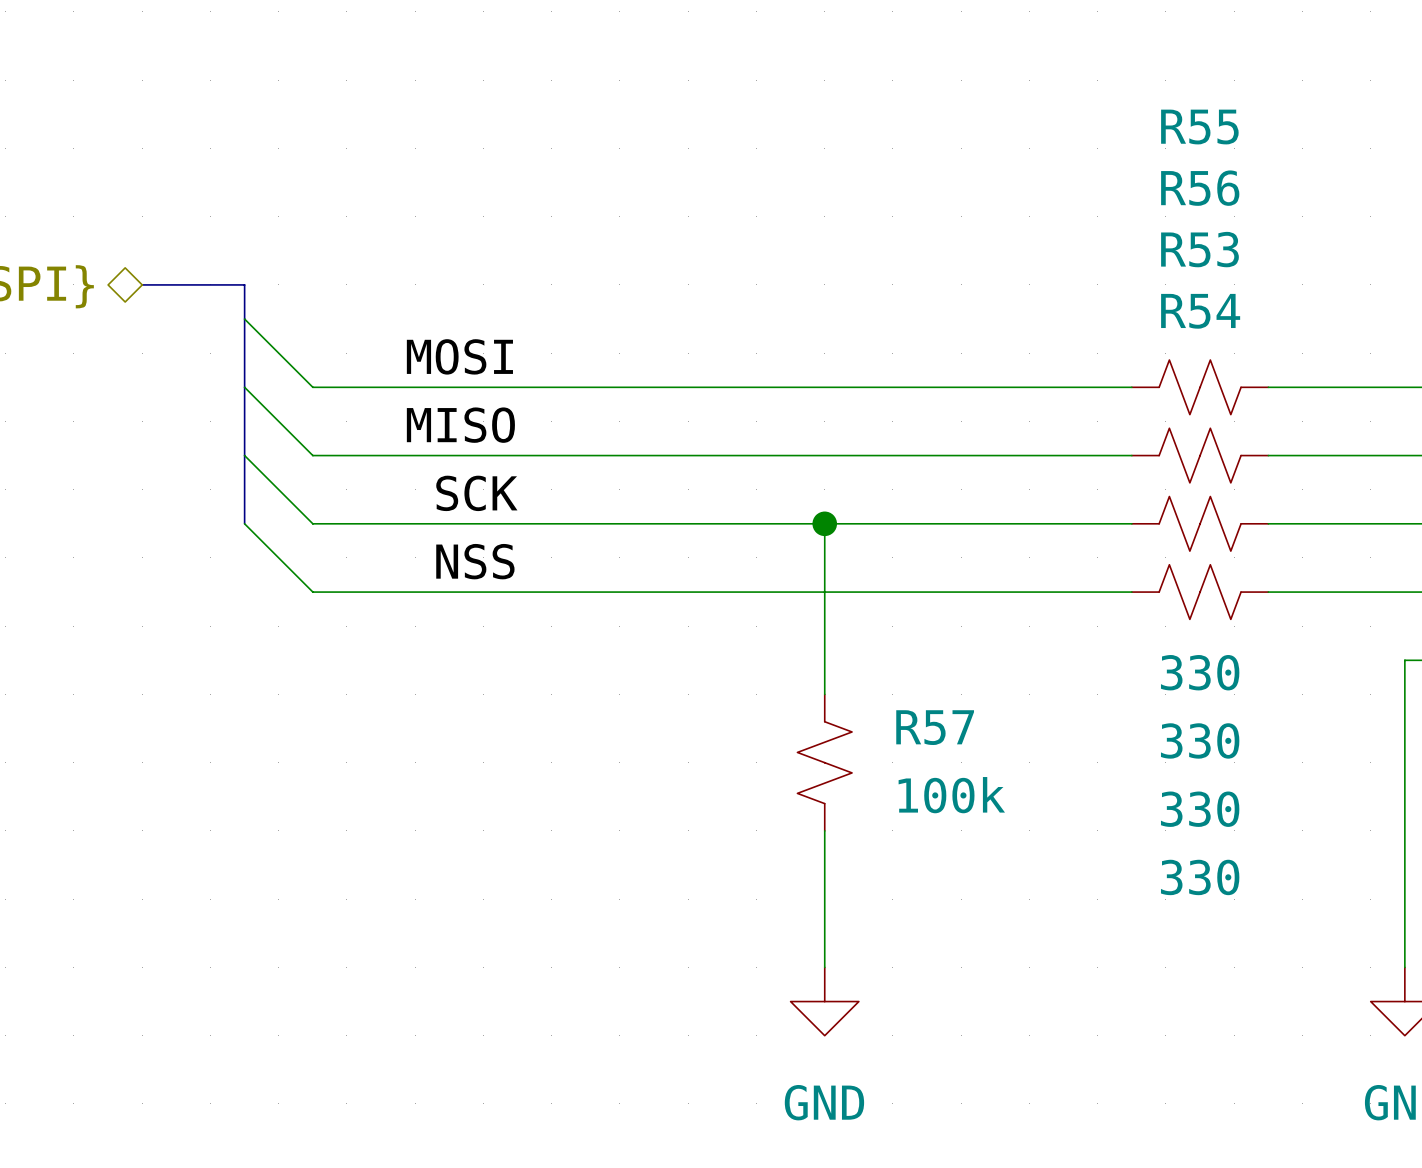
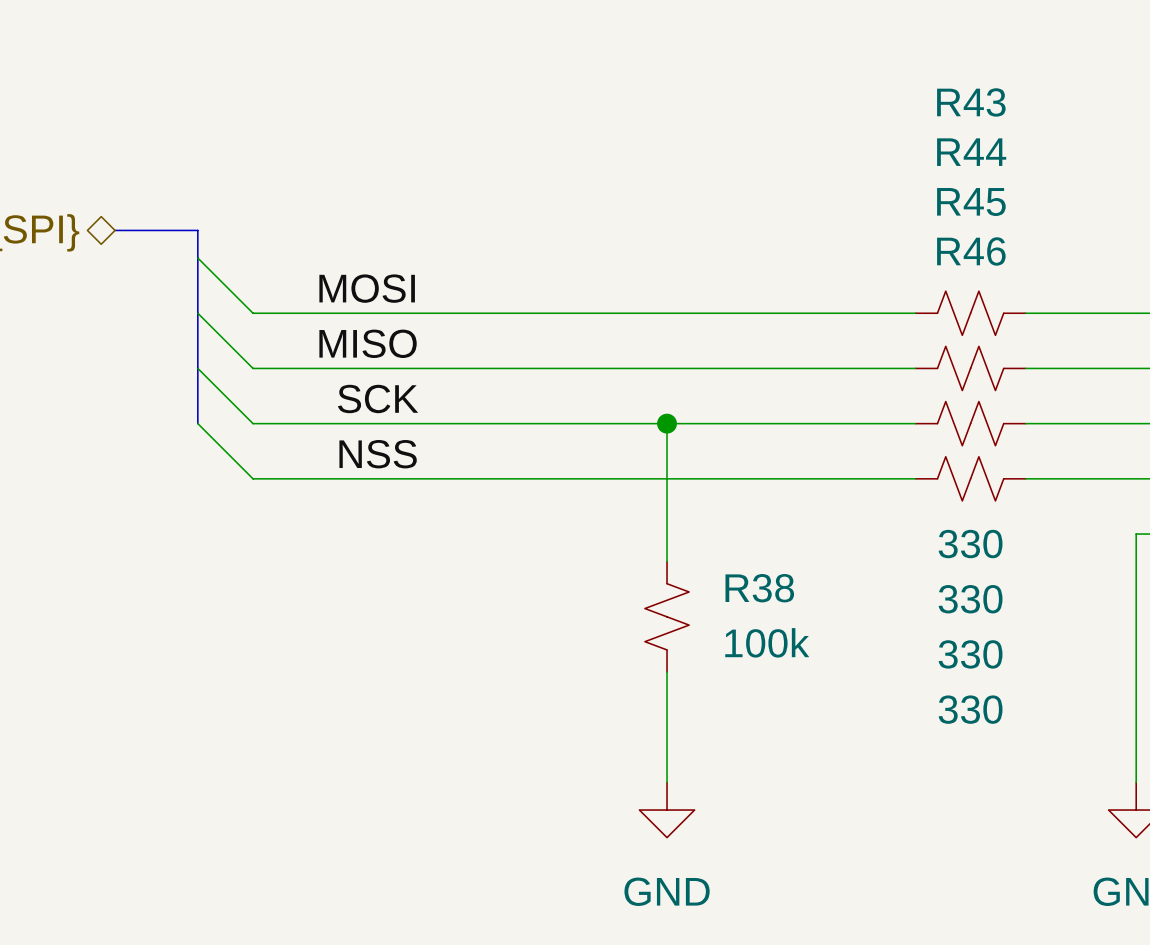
R55 name: R55 (1199, 127) -> R43 (971, 102)
R56 name: R56 (1200, 188) -> R44 (971, 152)
R53 name: R53 (1199, 249) -> R45 (971, 202)
R54 name: R54 (1200, 311) -> R46 (971, 251)
R57 name: R57 (935, 727) -> R38 (759, 588)

